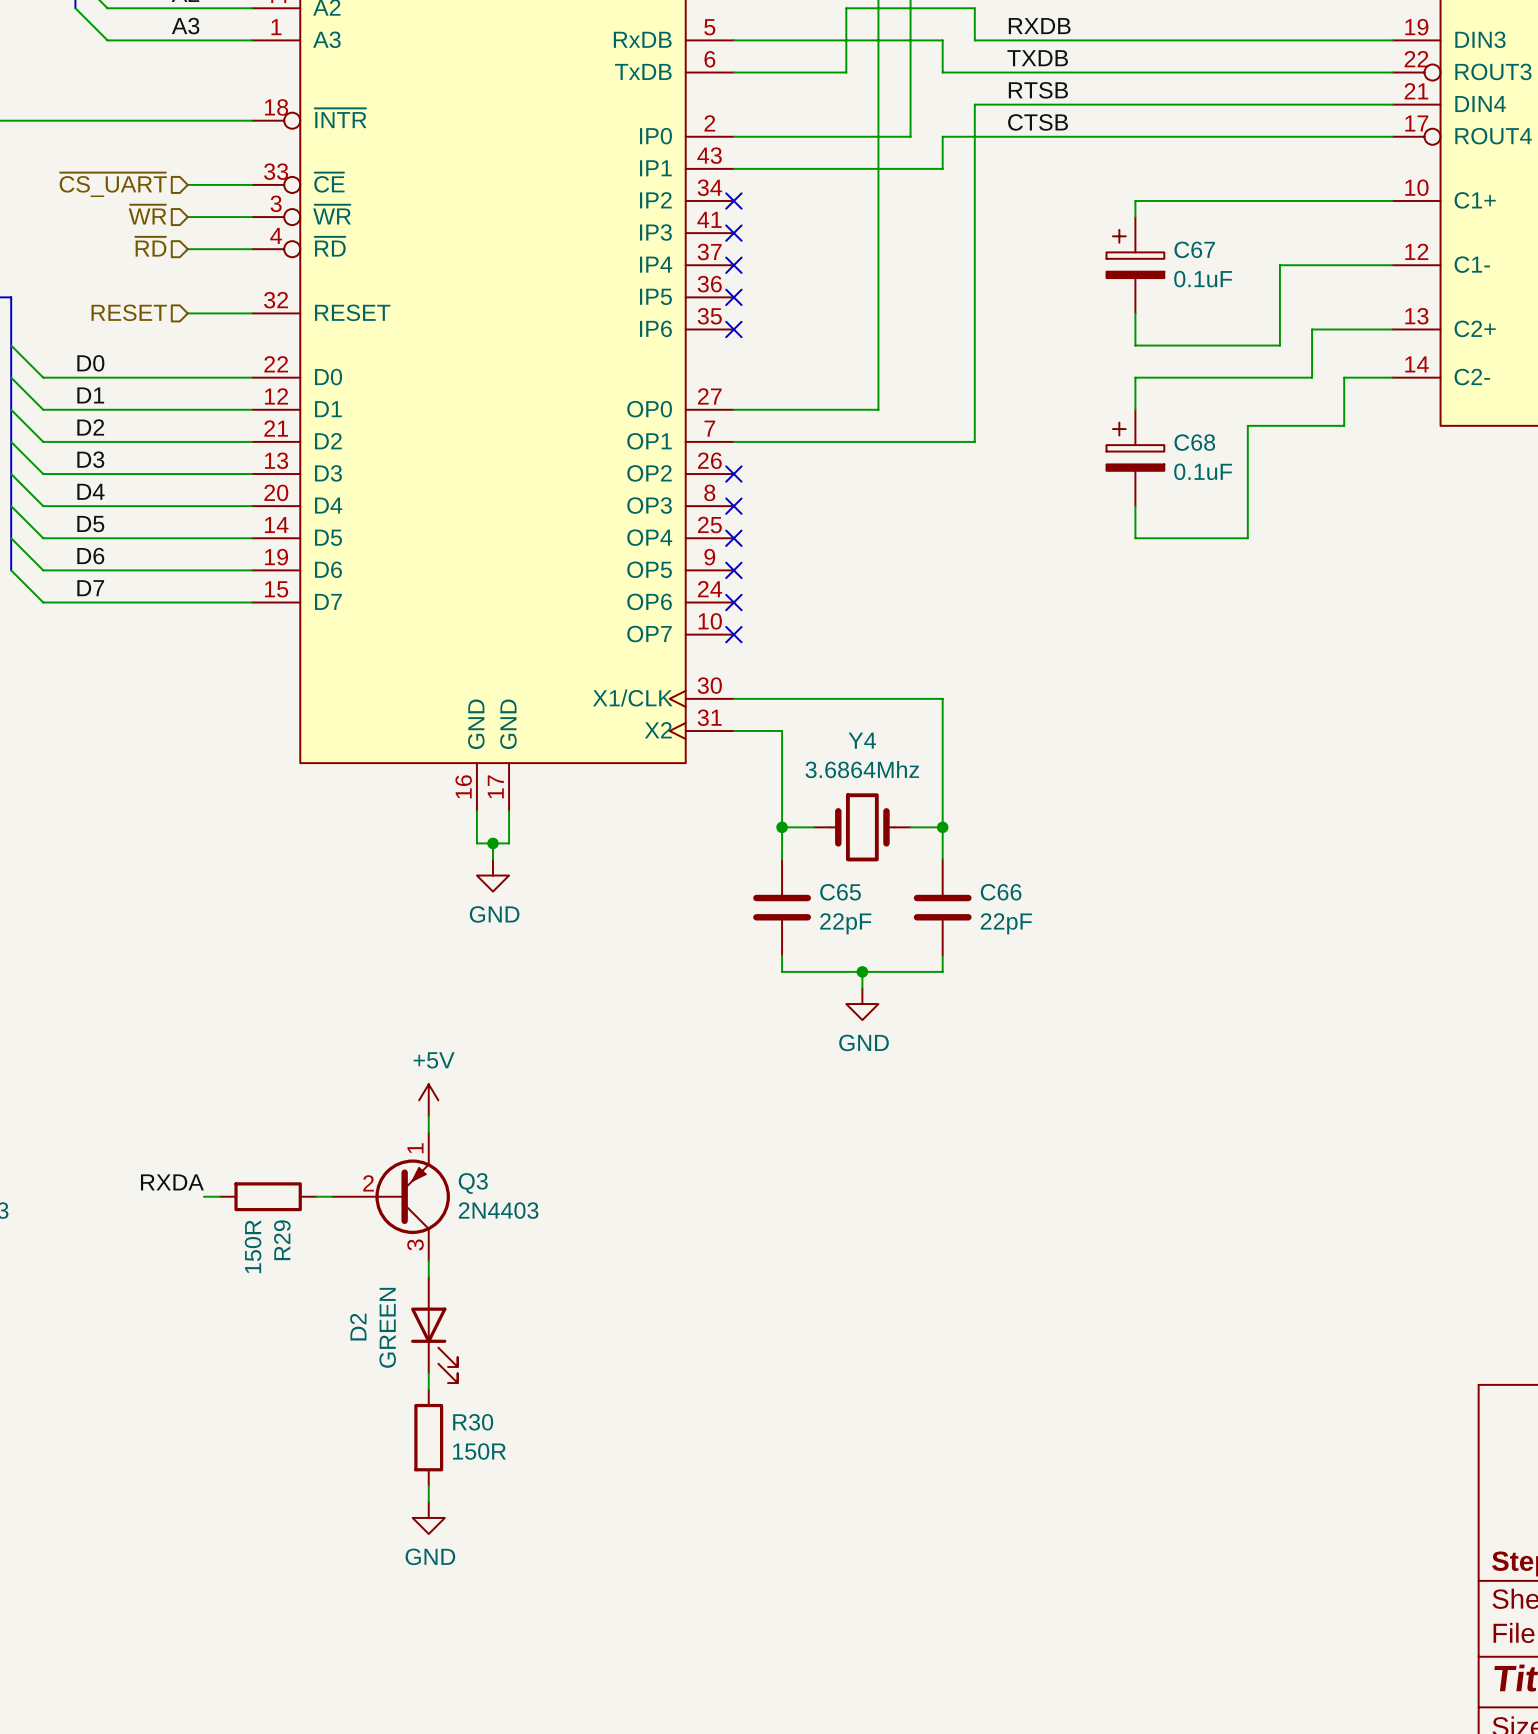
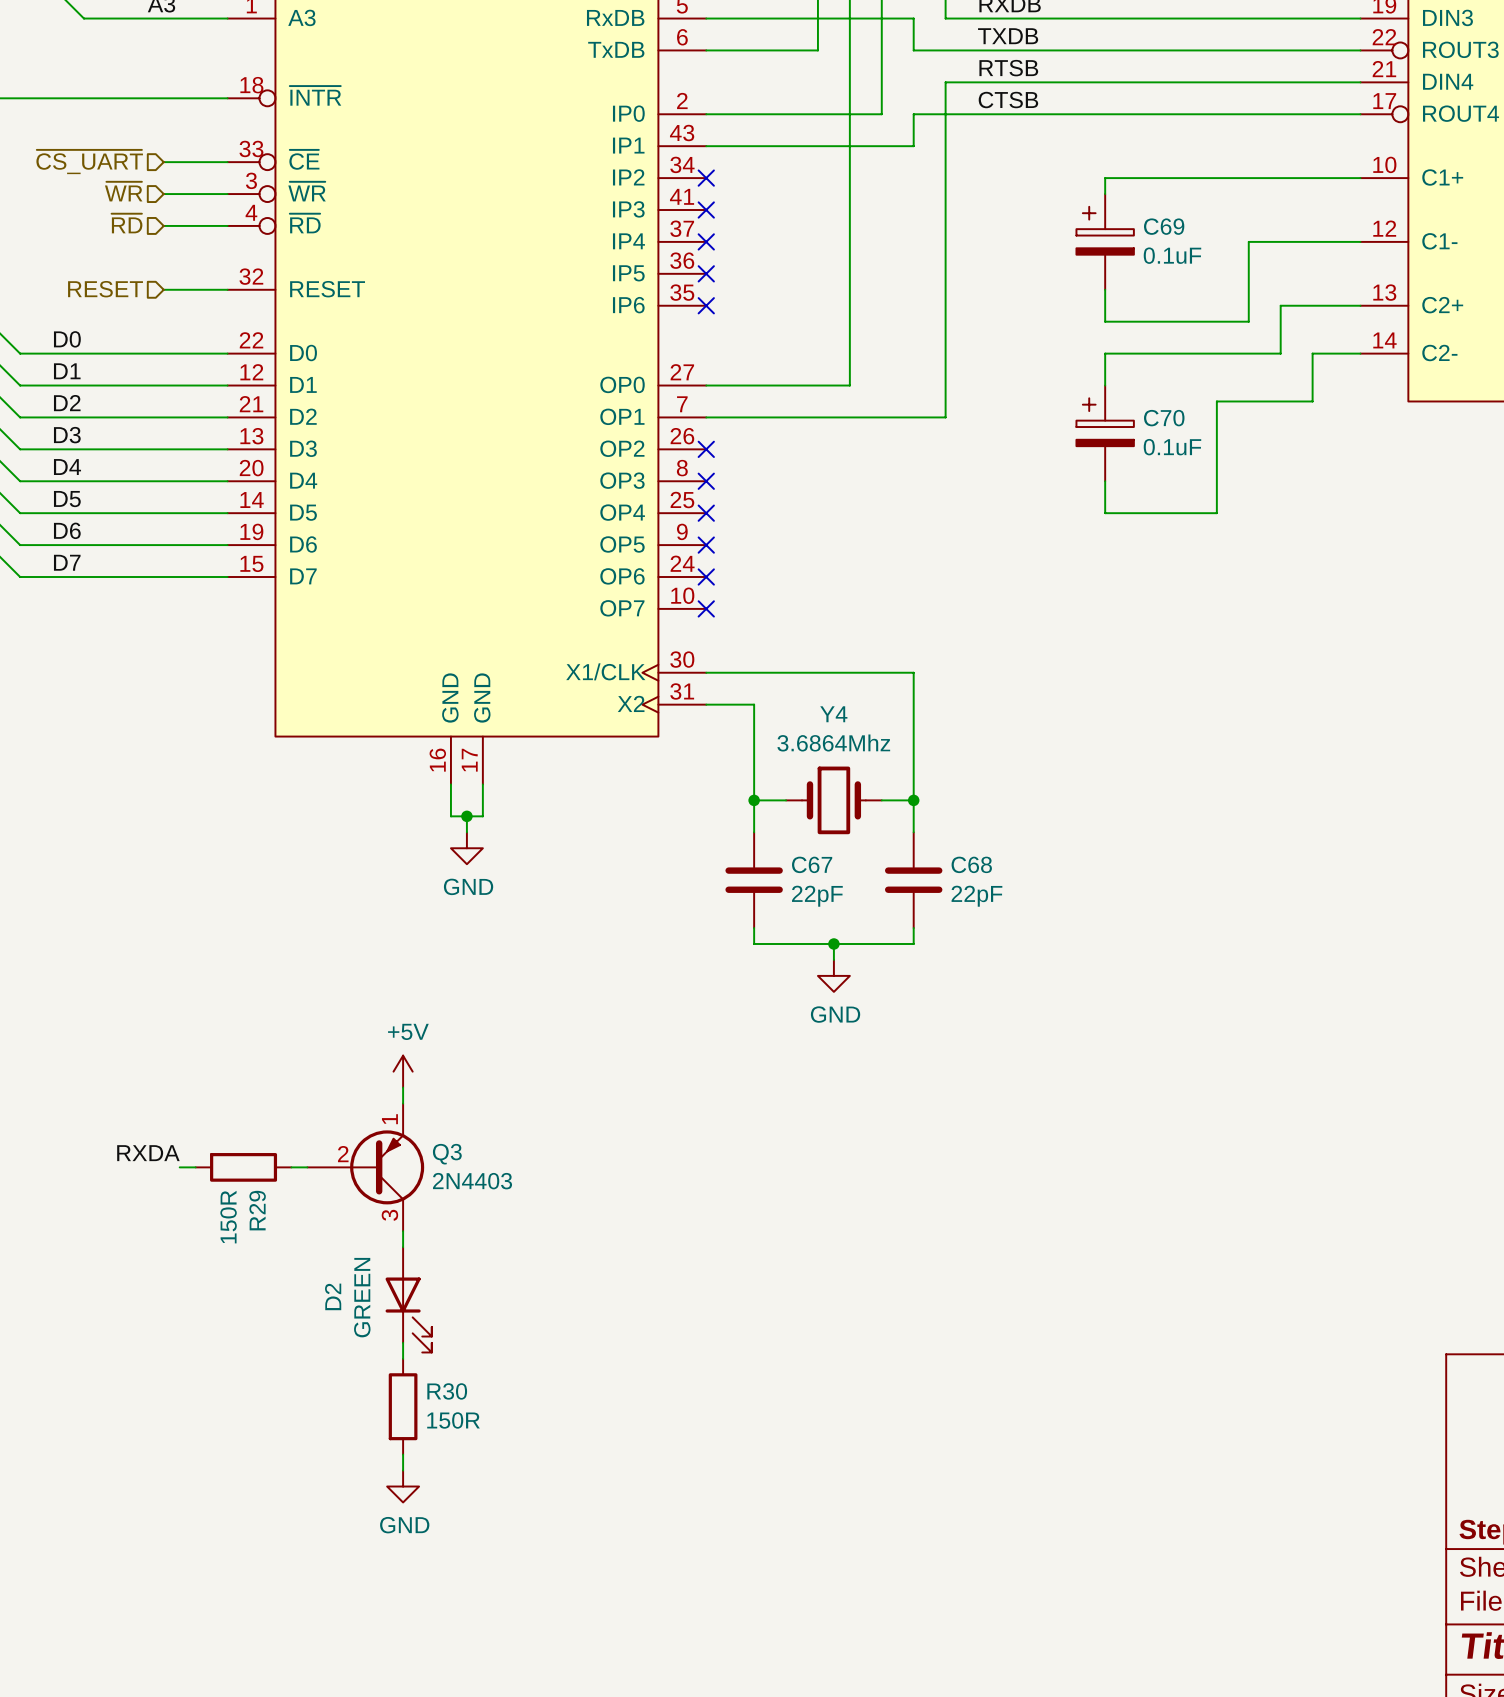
C67 name: C67 (1194, 249) -> C69 (1164, 226)
C68 name: C68 (1194, 442) -> C70 (1164, 418)
C65 name: C65 (840, 892) -> C67 (812, 864)
C66 name: C66 (1001, 892) -> C68 (971, 864)

